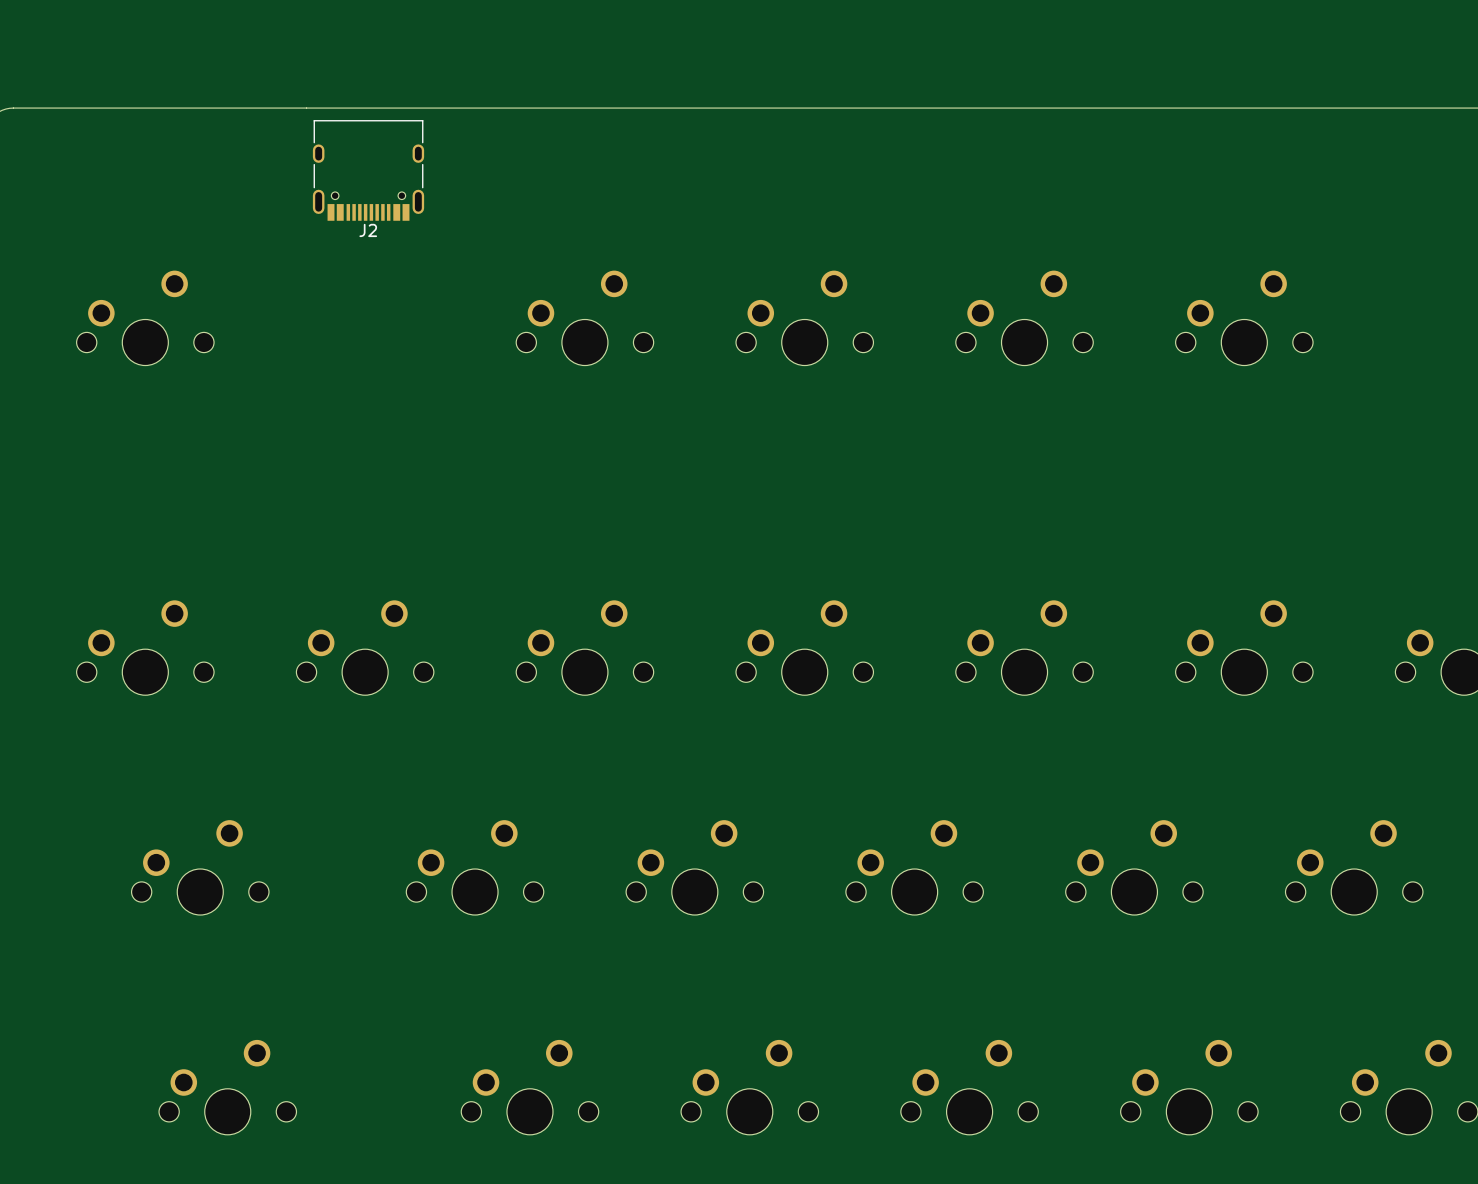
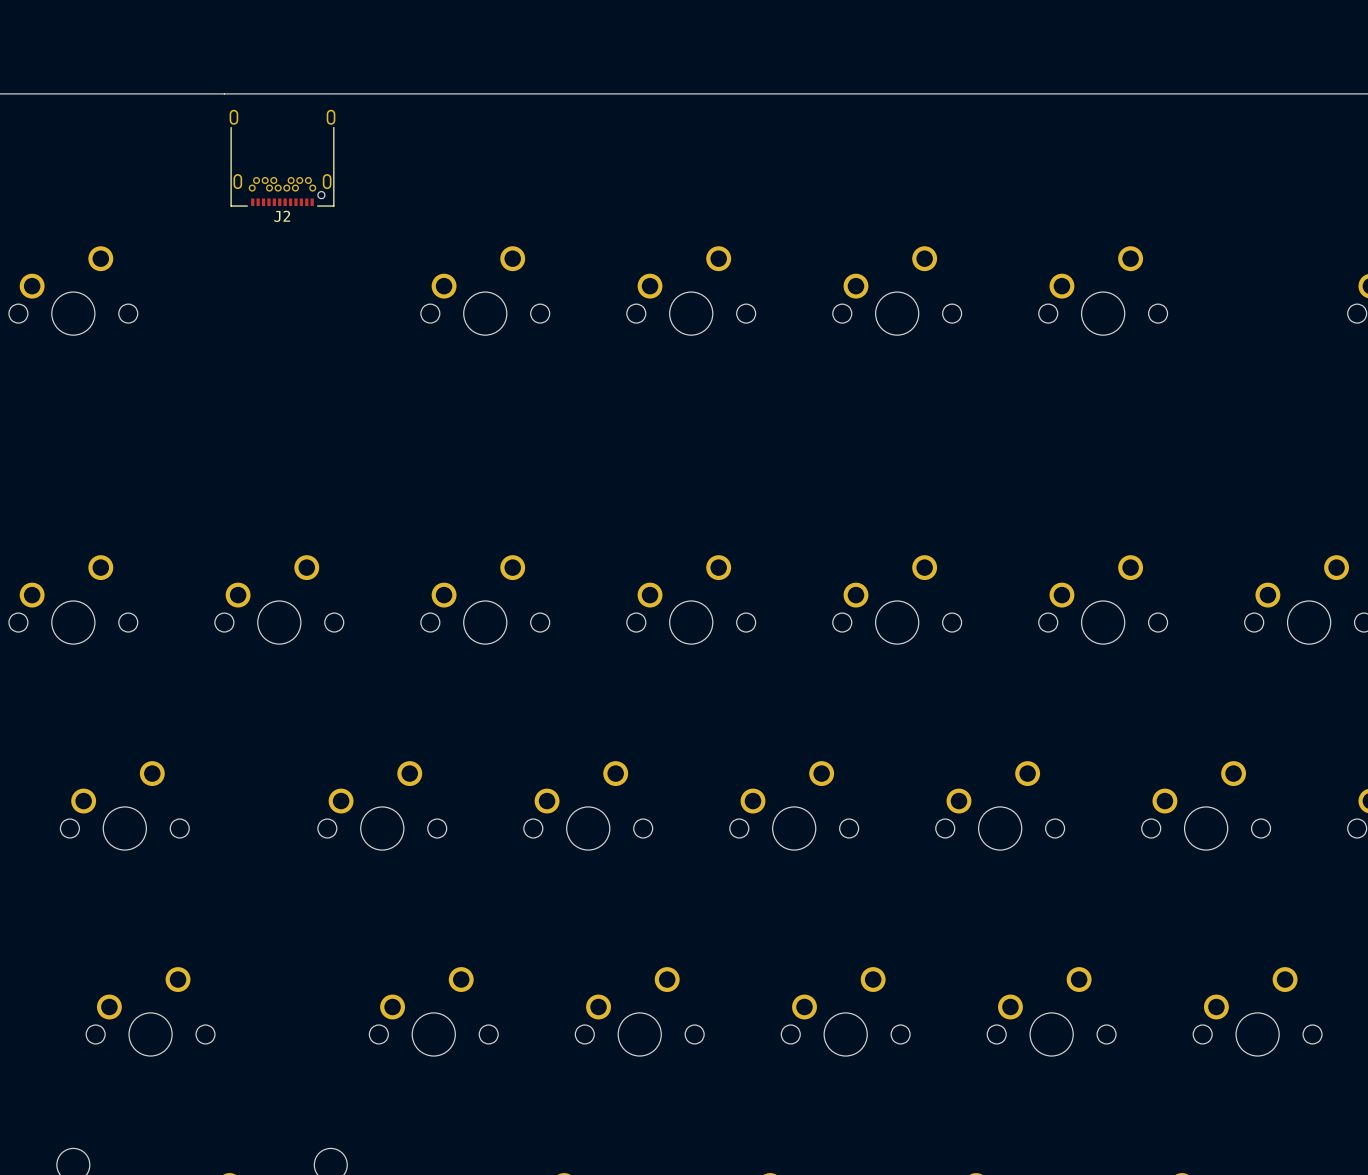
J2 footprint: [312, 120, 425, 221] -> [229, 109, 336, 207]

